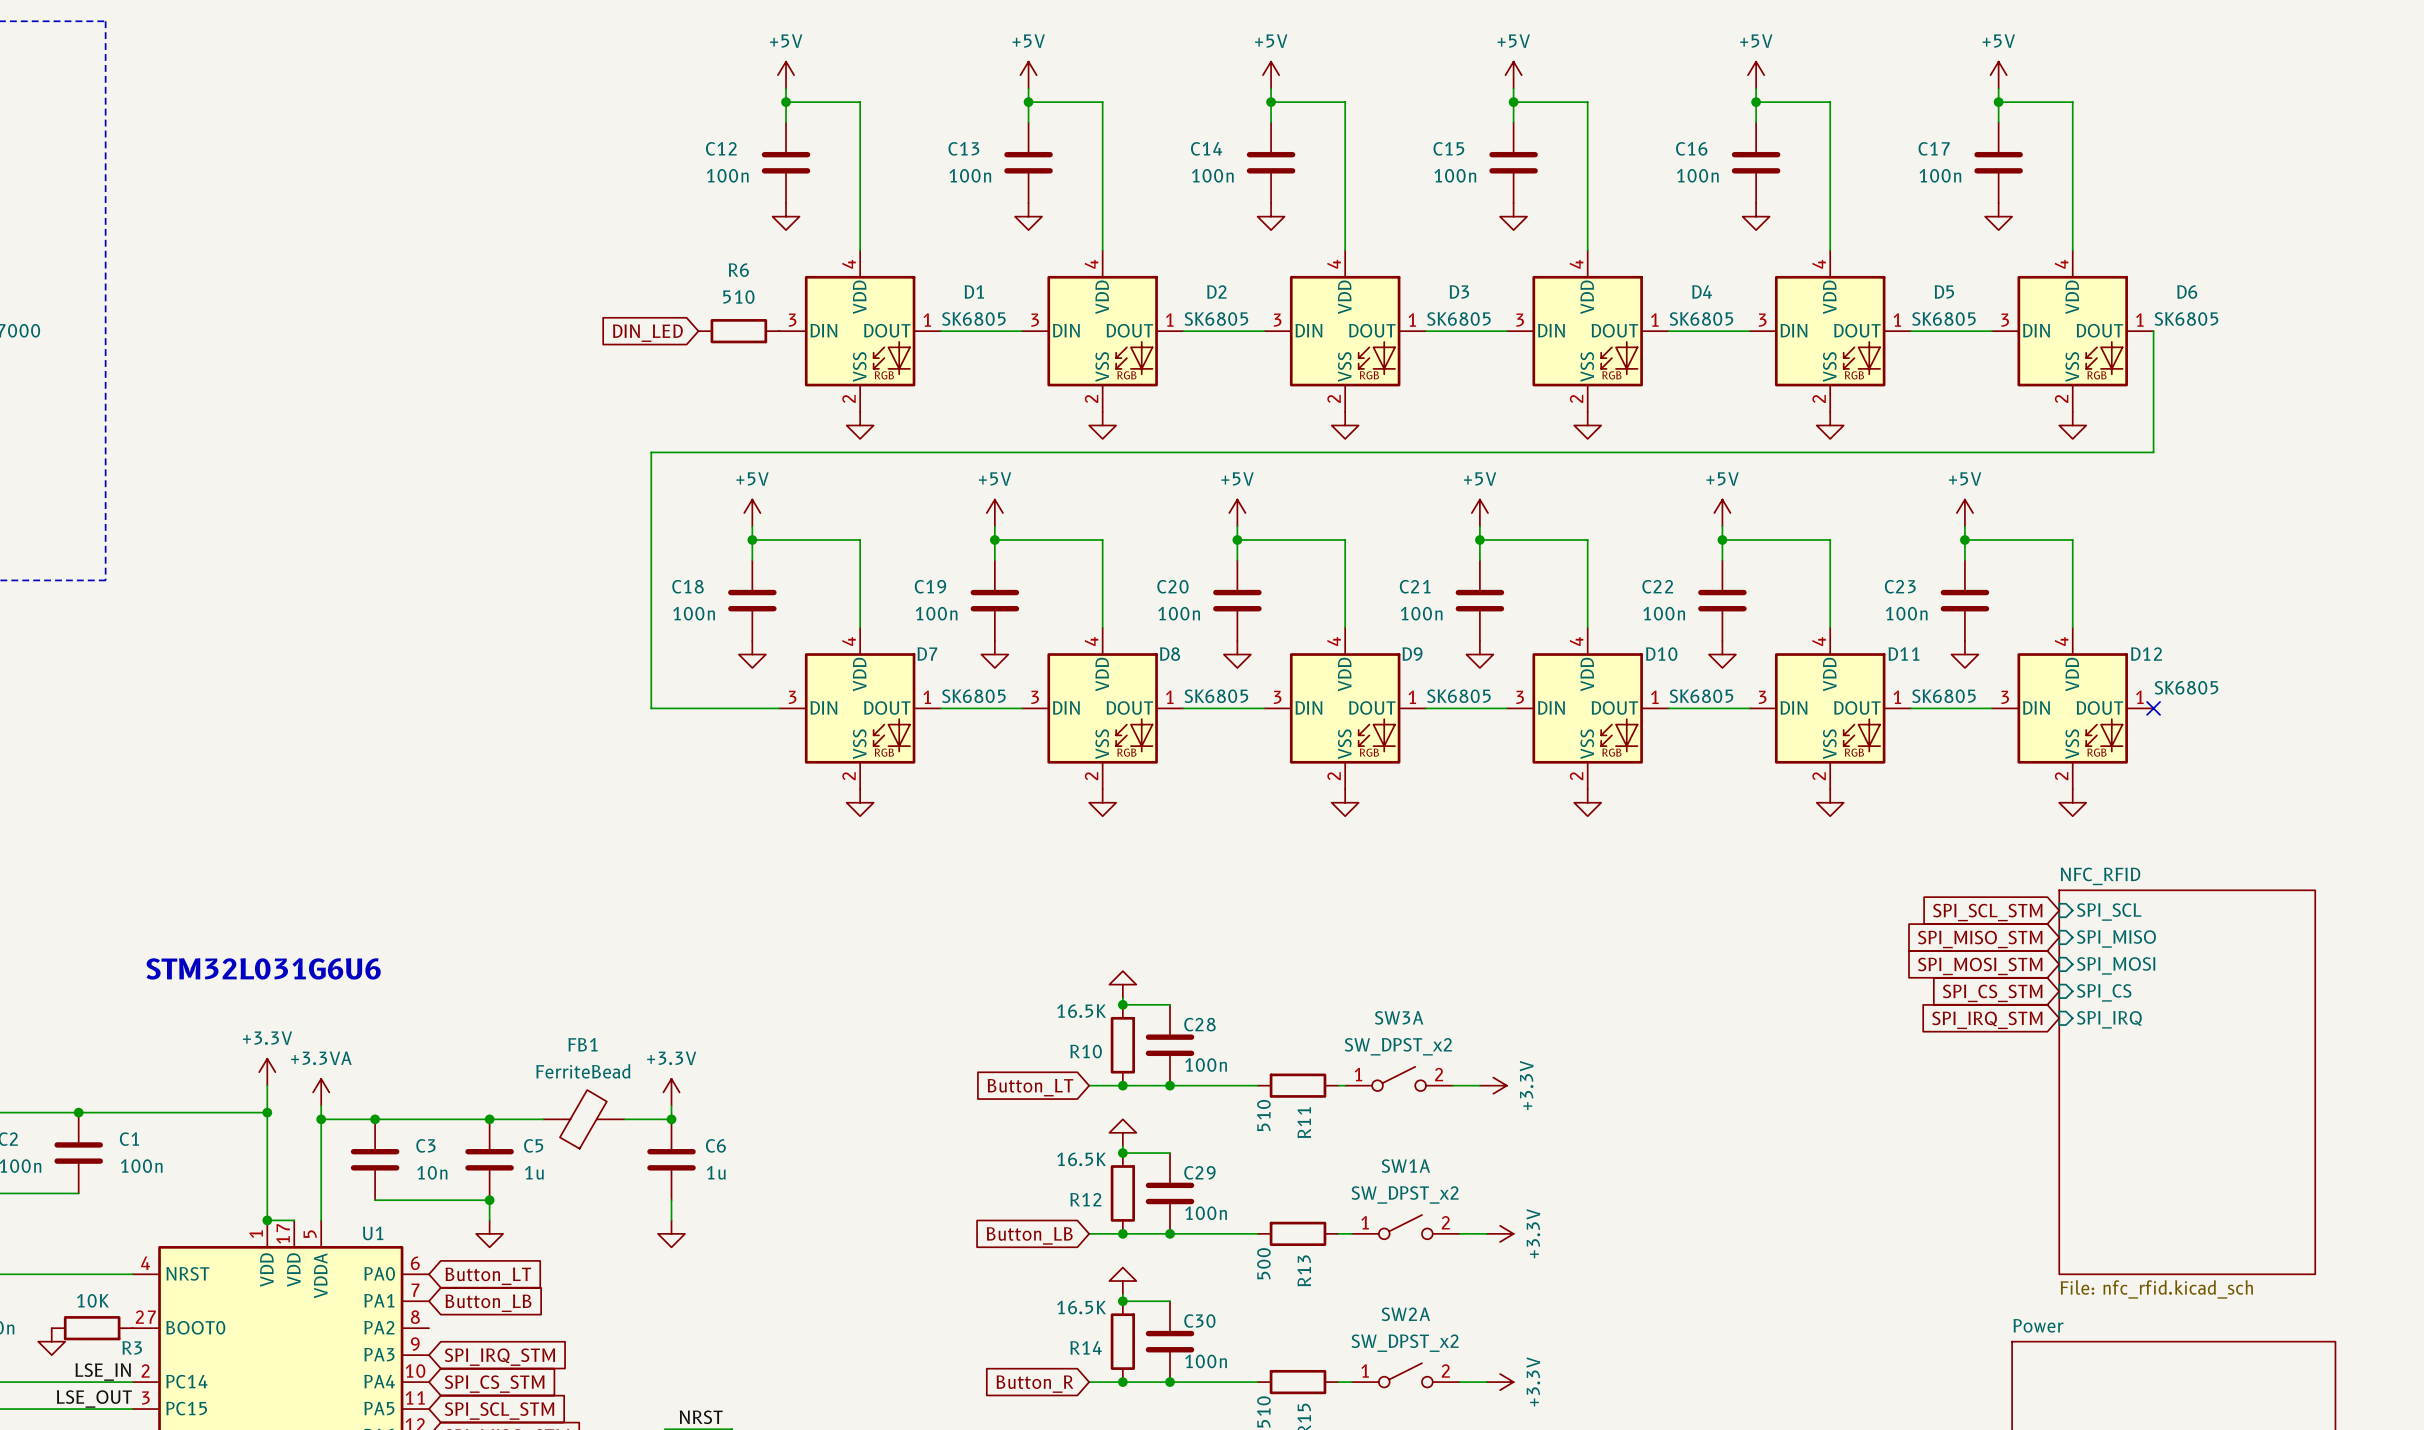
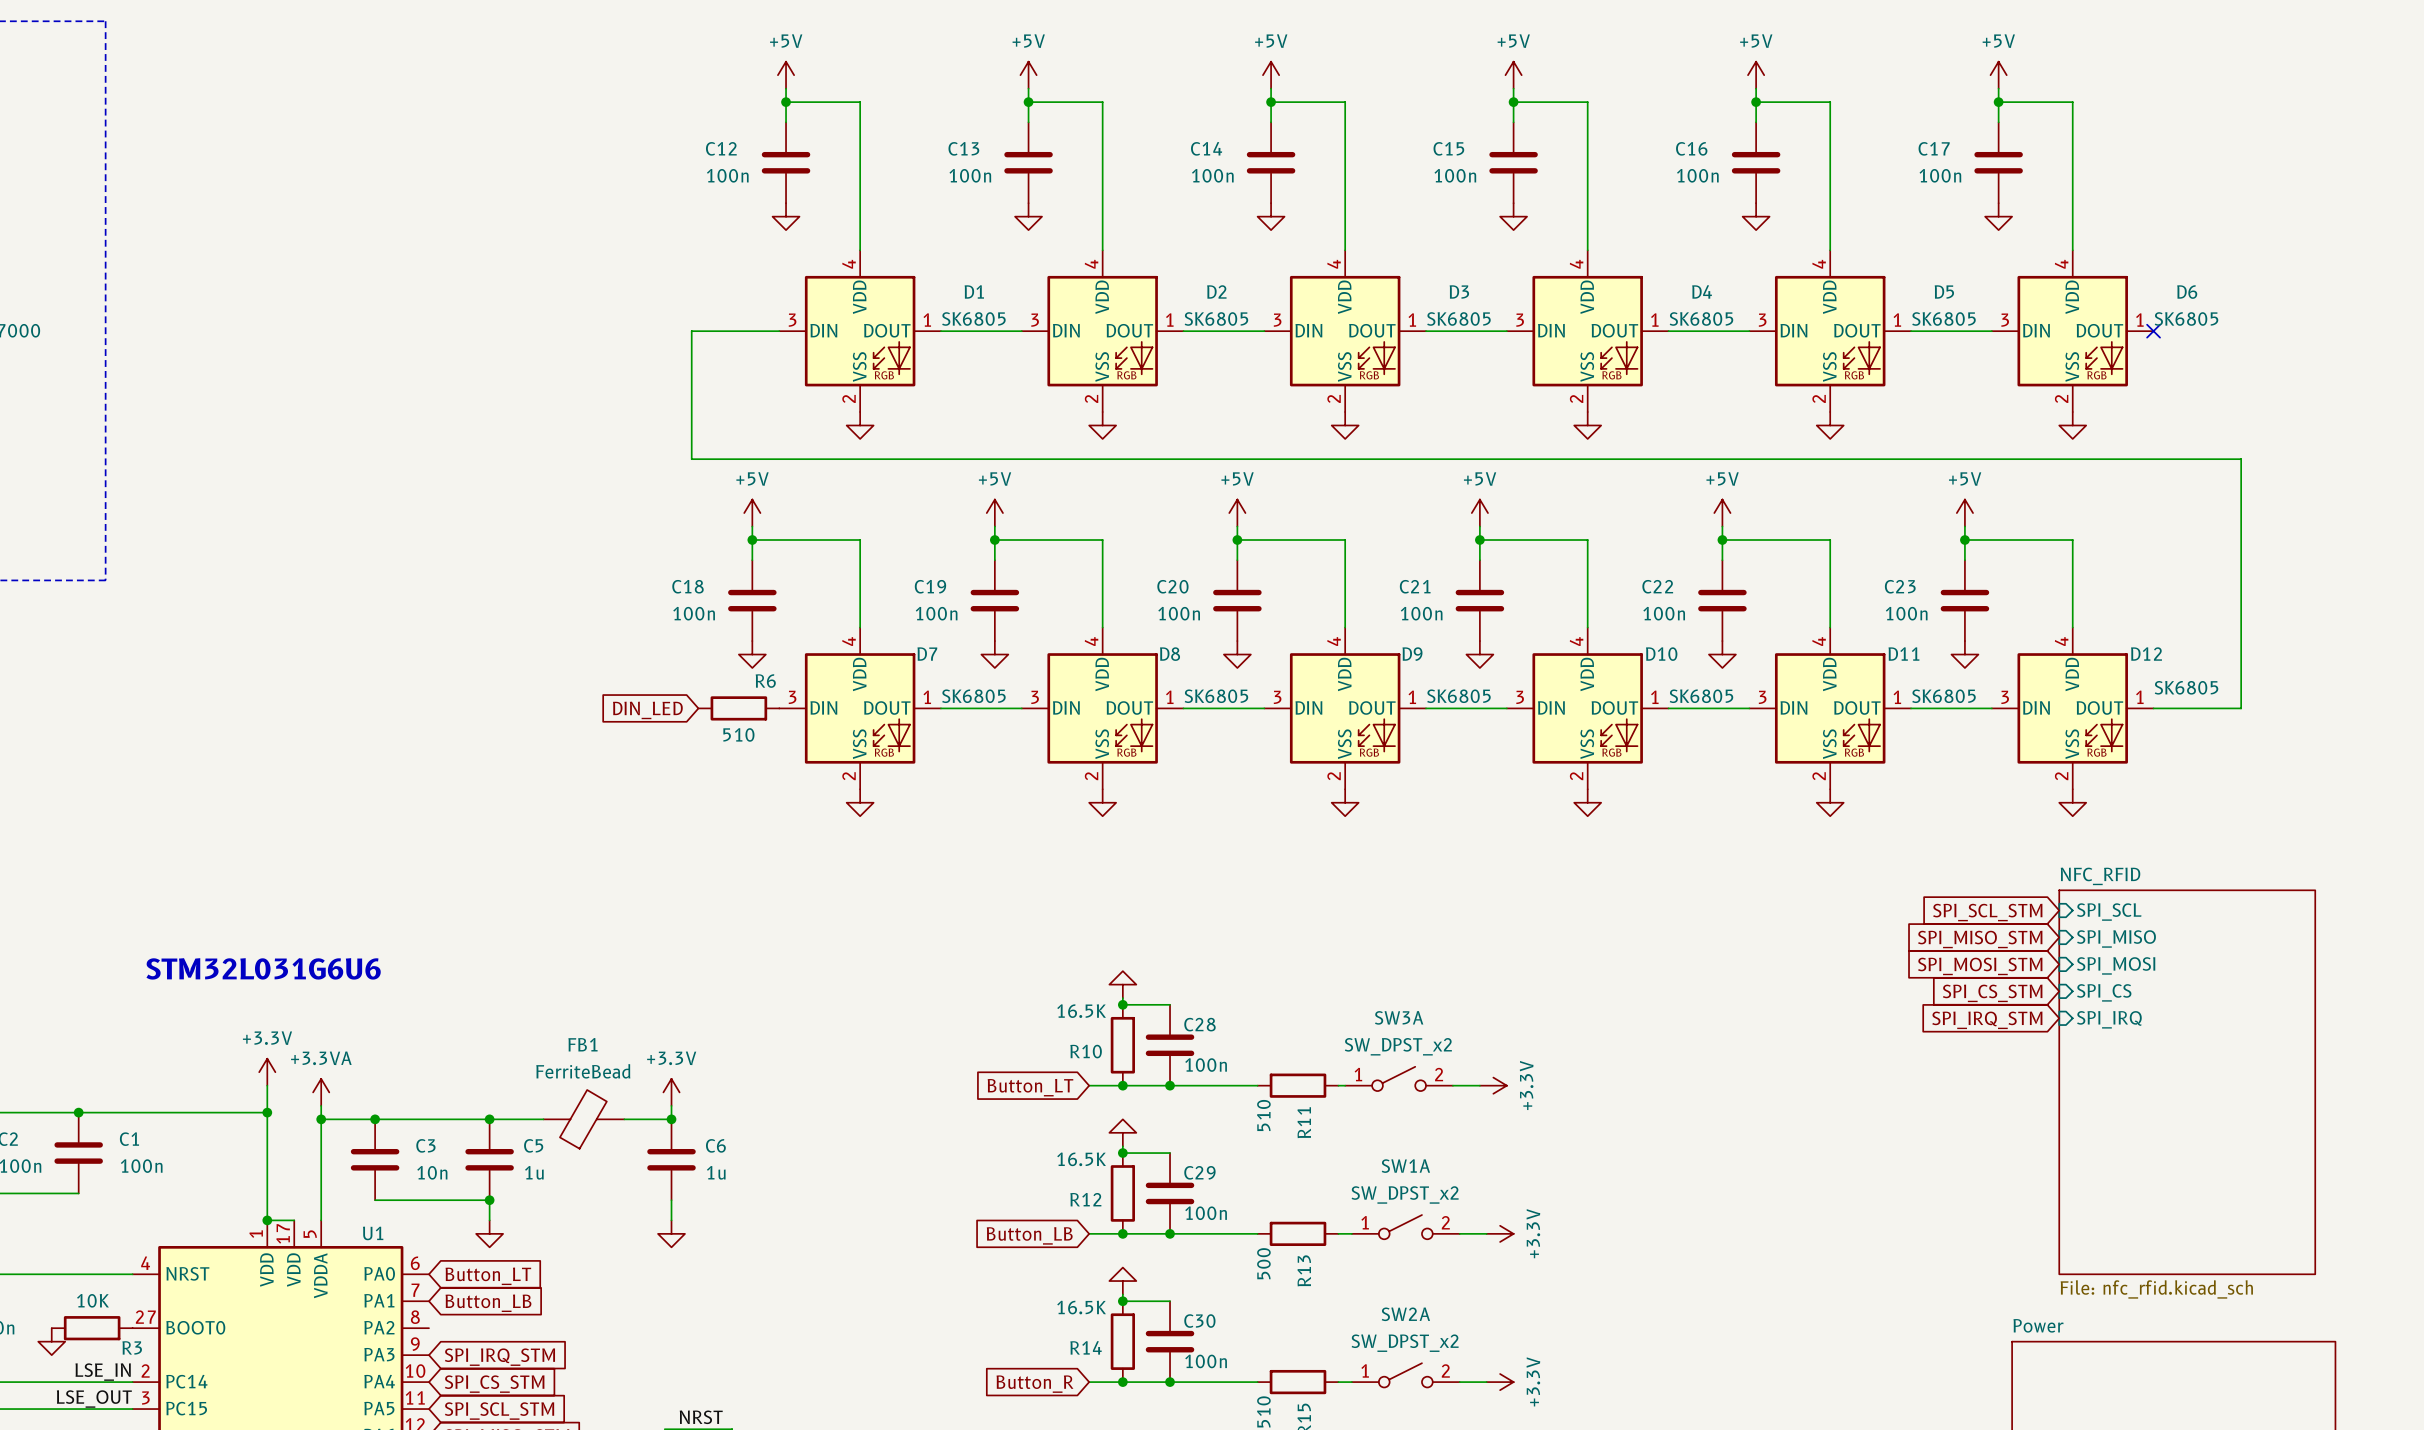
R6 name position: R6 (738, 270) -> R6 (765, 681)
R6 value position: 510 (738, 297) -> 510 (738, 734)
R6 position: (738, 331) -> (738, 708)
wire: none -> (779, 331) (691, 331) (691, 459) (2241, 459) (2241, 708) (2153, 708)
wire: (2153, 331) (2153, 452) (651, 452) (651, 708) (779, 708) -> none
no-connect mark: none -> (2153, 331)
global label: DIN_LED (647, 333) -> none
no-connect mark: (2153, 708) -> none
global label: none -> DIN_LED (647, 710)

